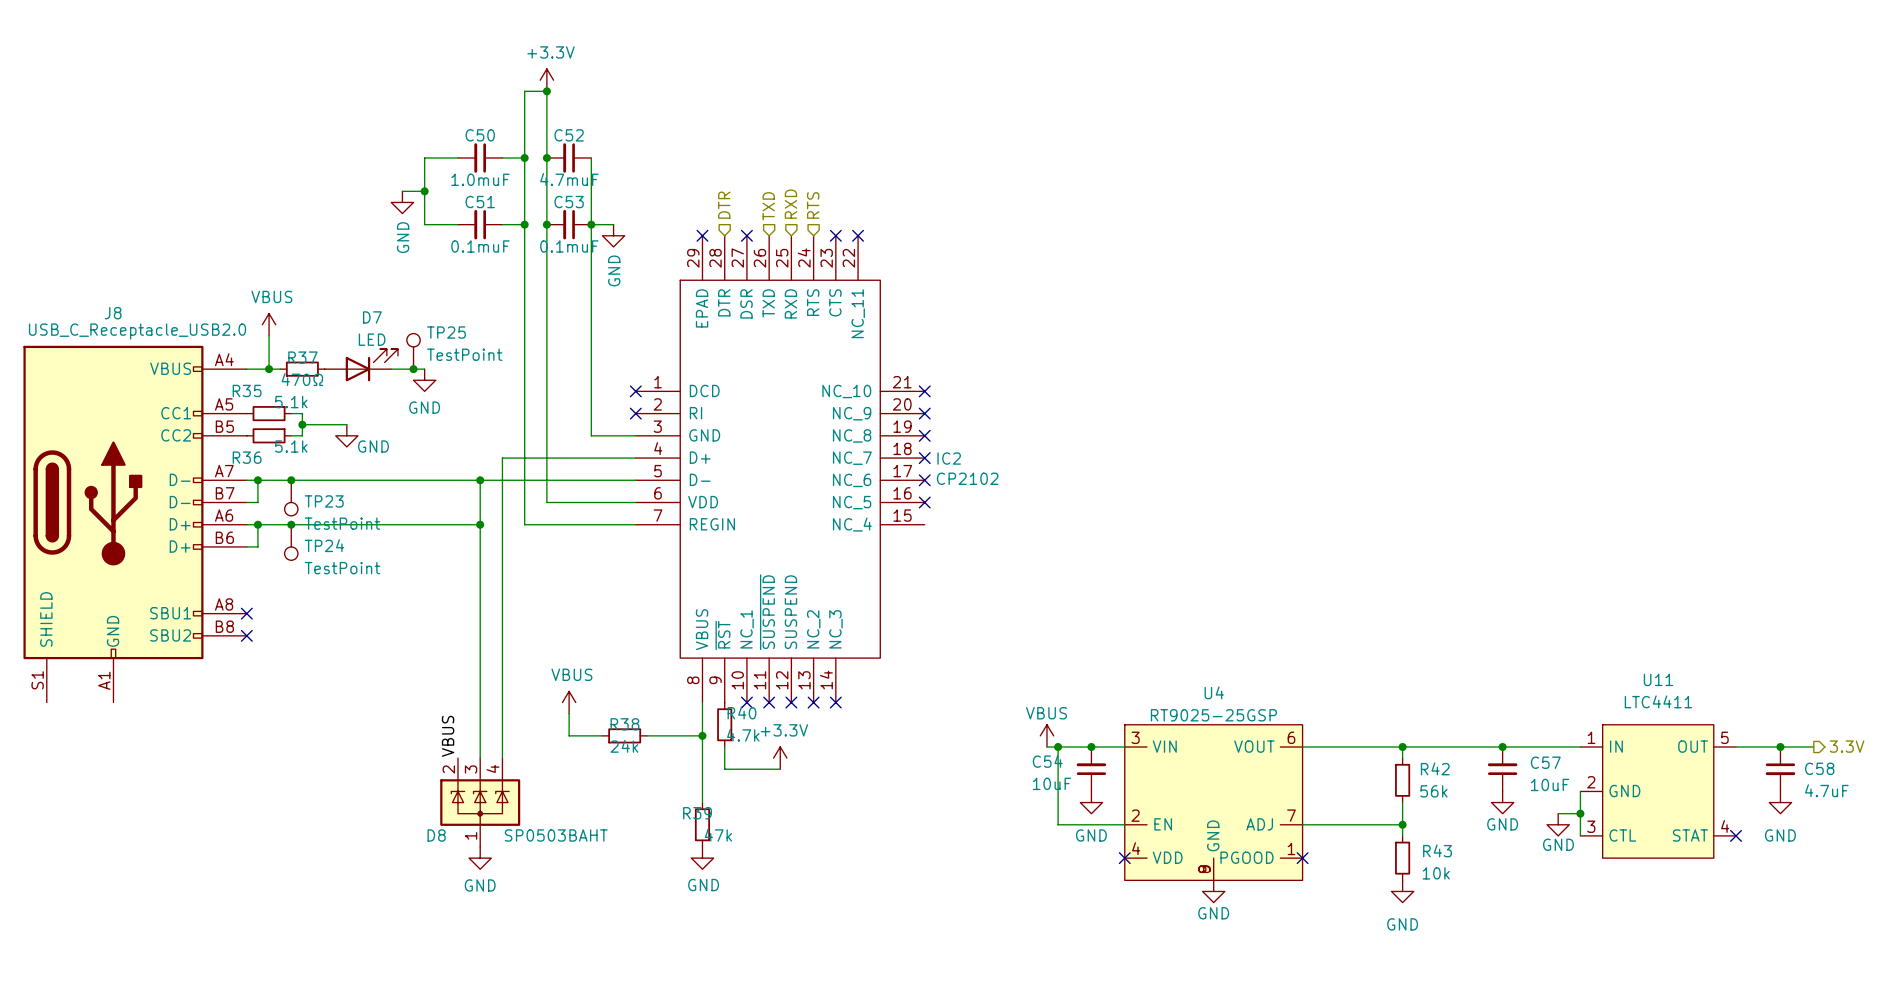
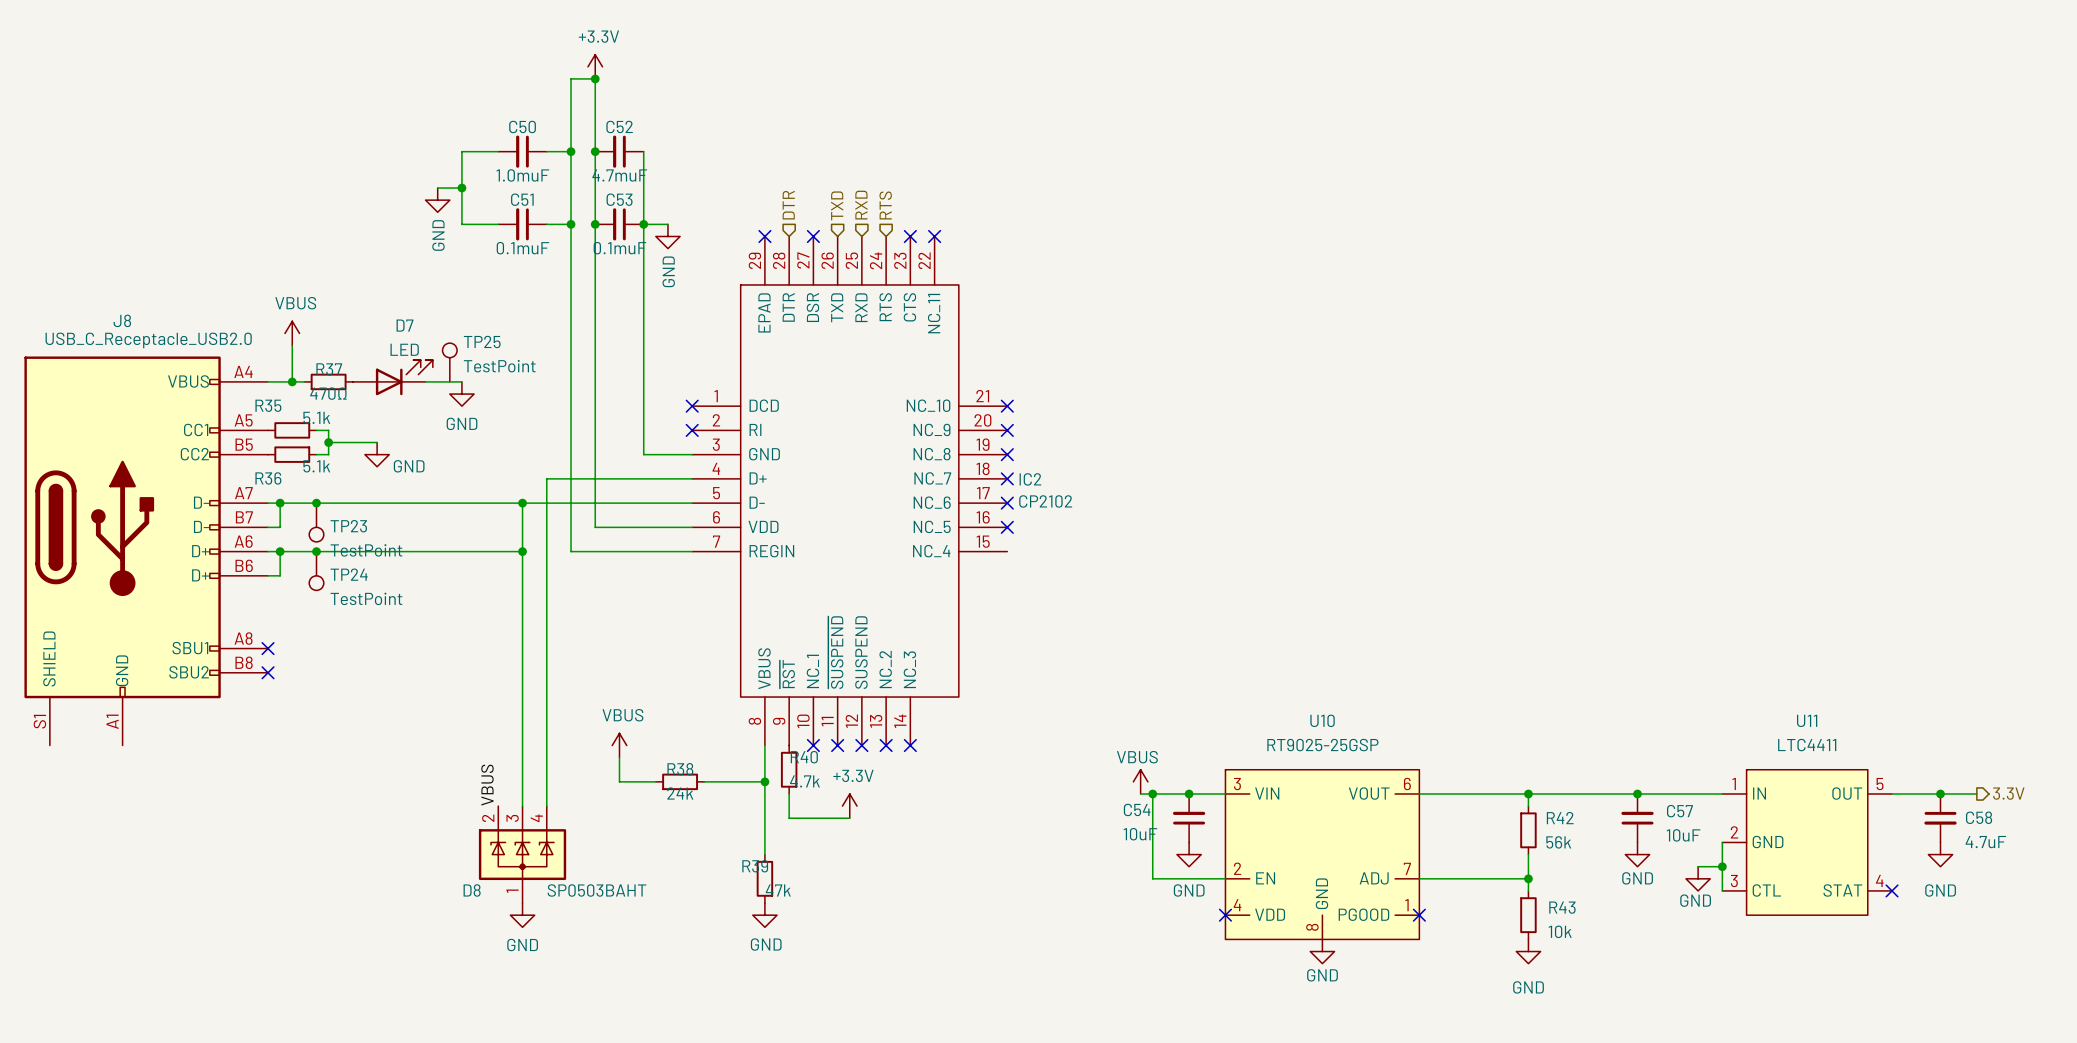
junction: (413, 369) -> none
U4 name: U4 (1214, 692) -> U10 (1322, 720)
U4 symbol: [1124, 724, 1303, 881] -> [1225, 769, 1420, 940]

